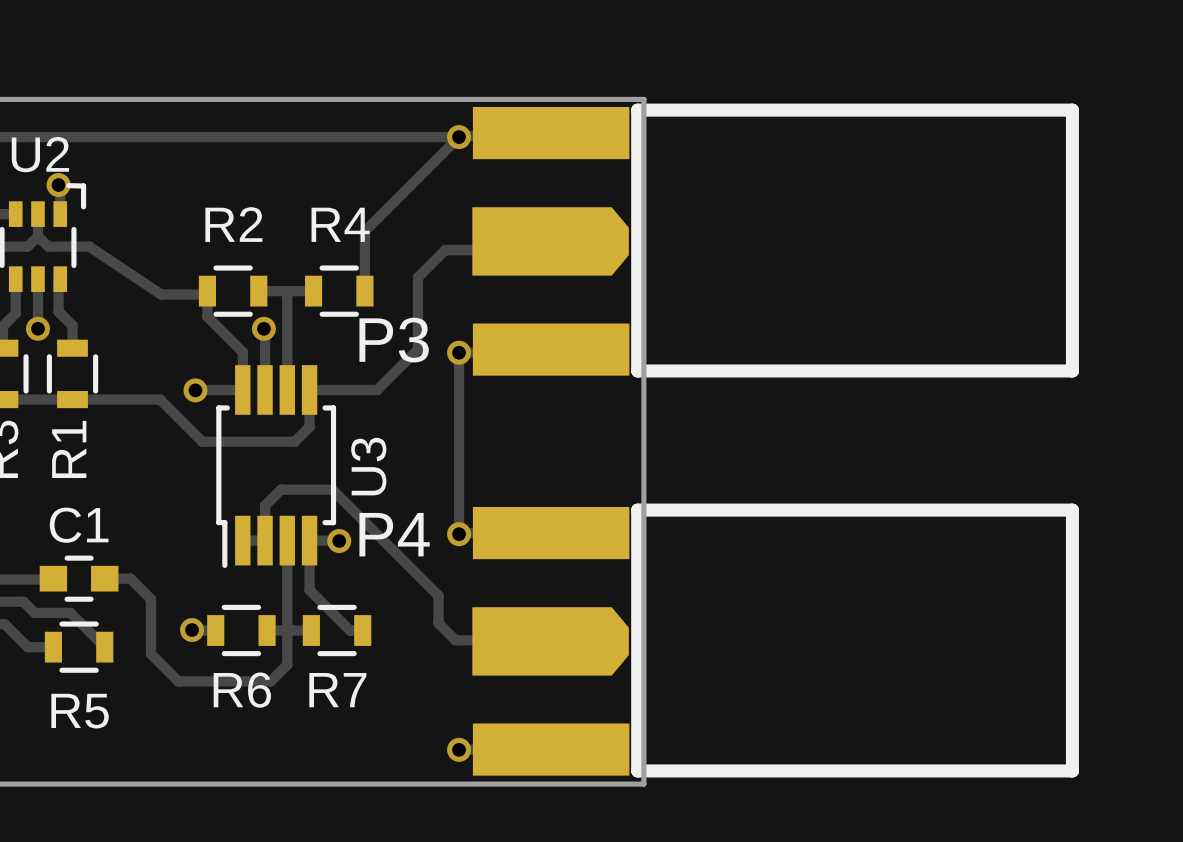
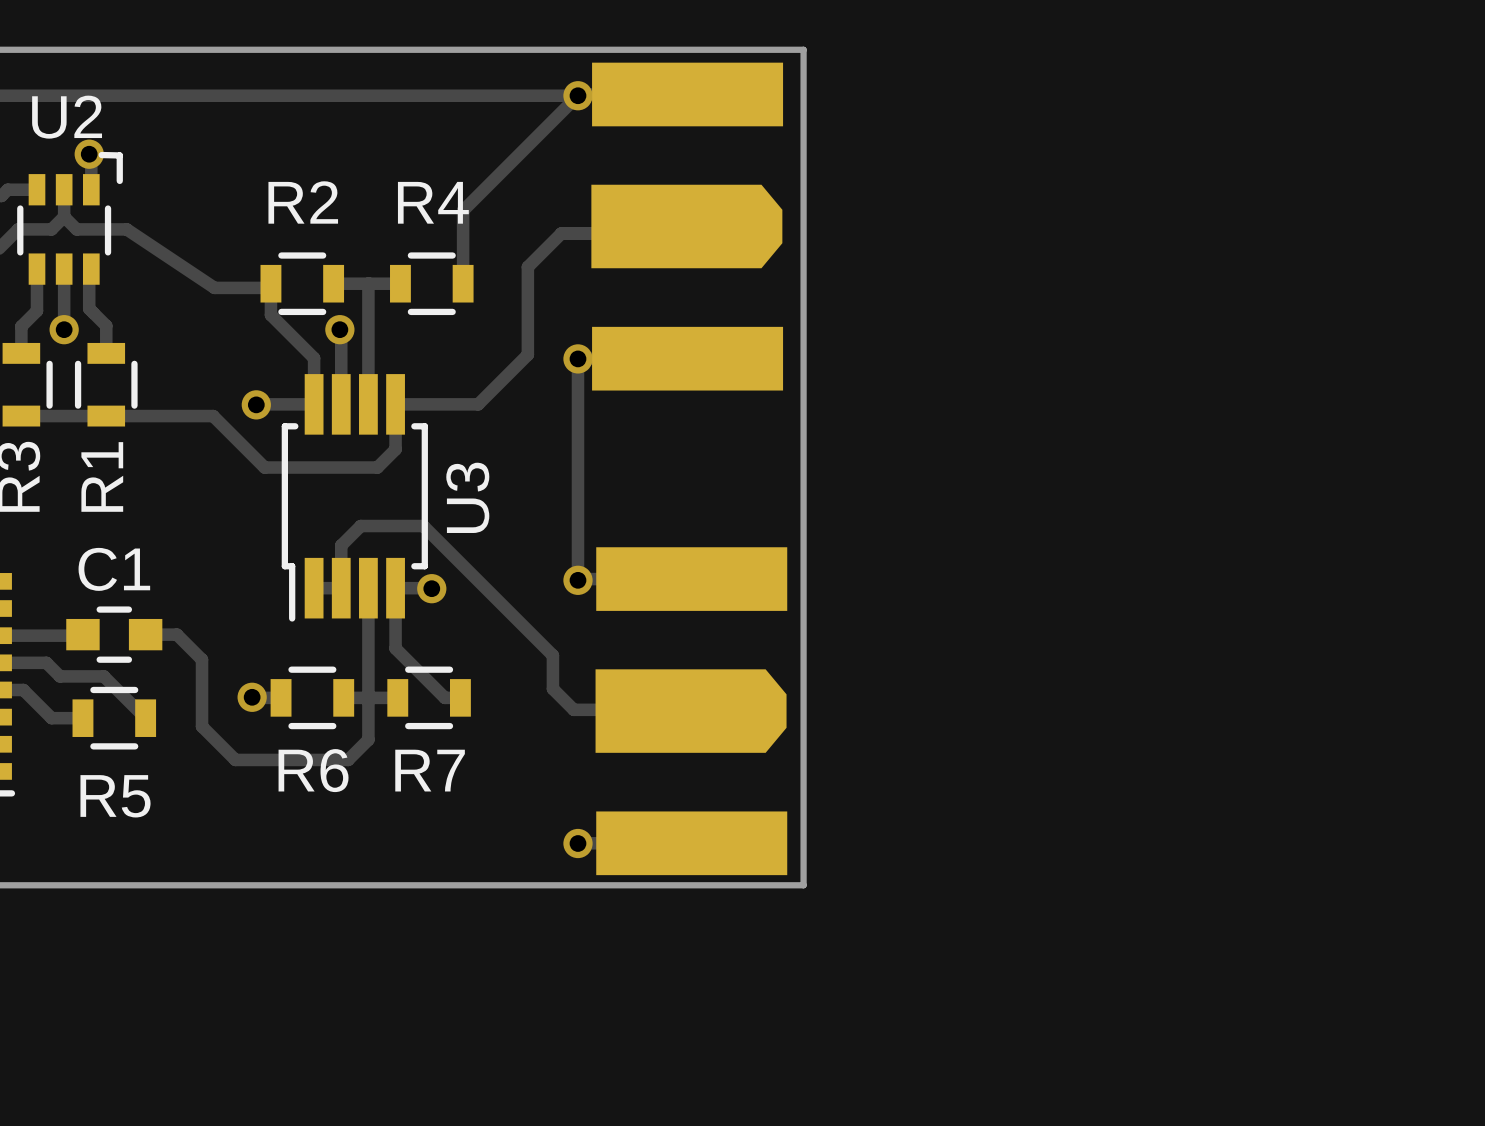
P3 side: top (775, 240) -> bottom (687, 226)
P4 side: top (775, 640) -> bottom (691, 711)

